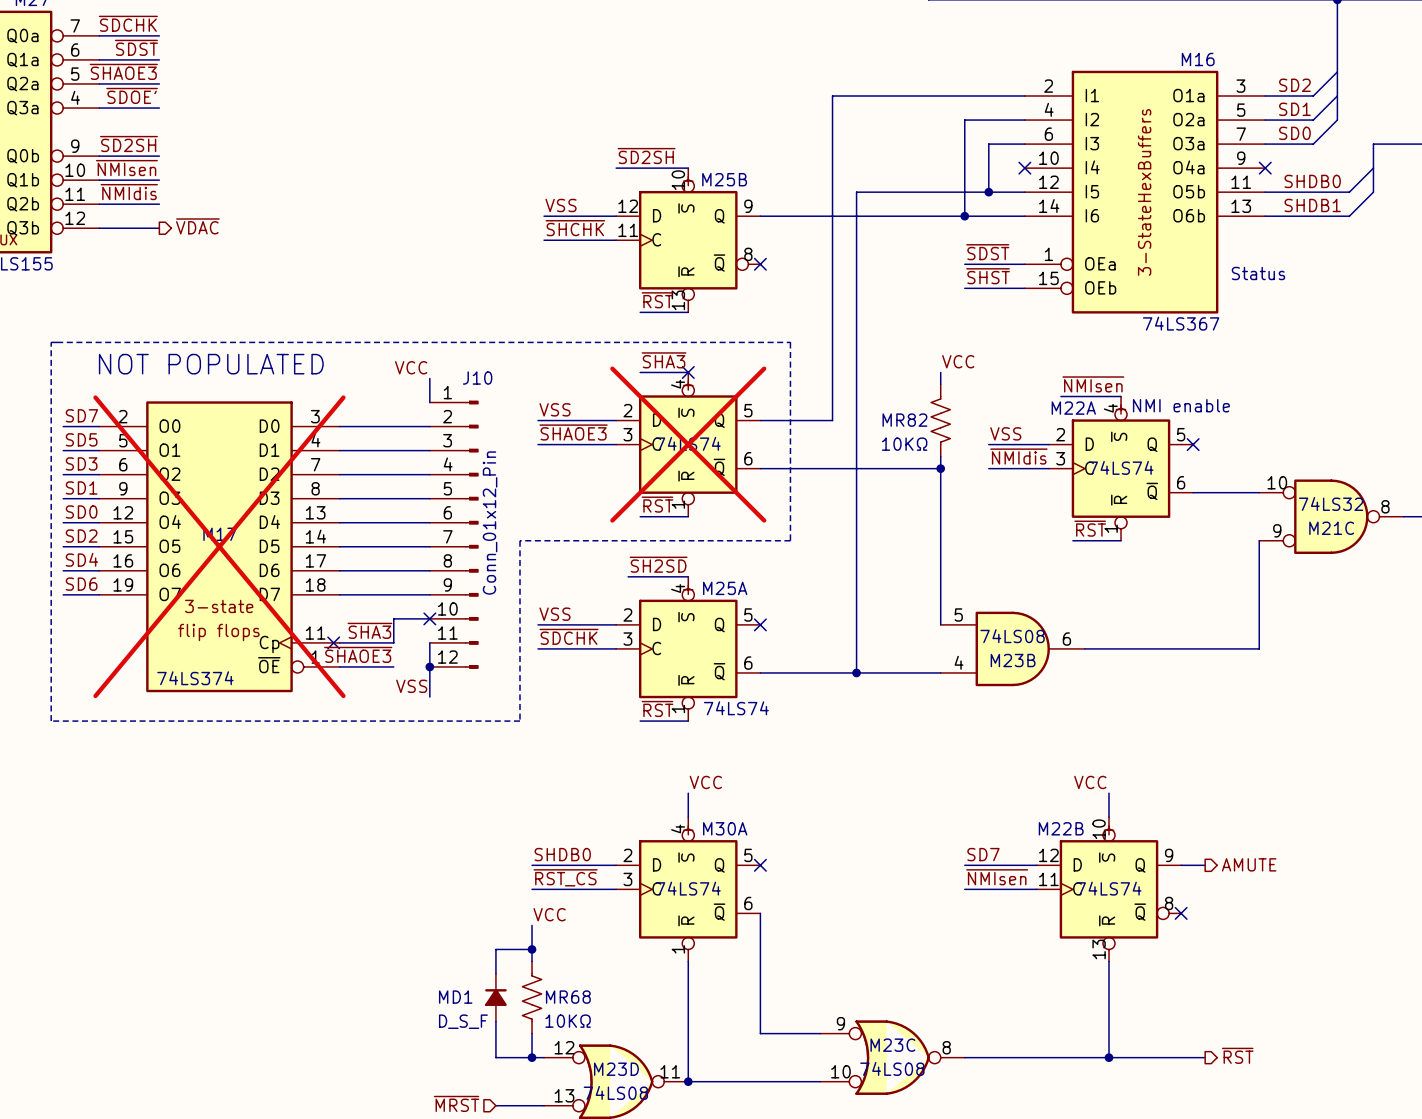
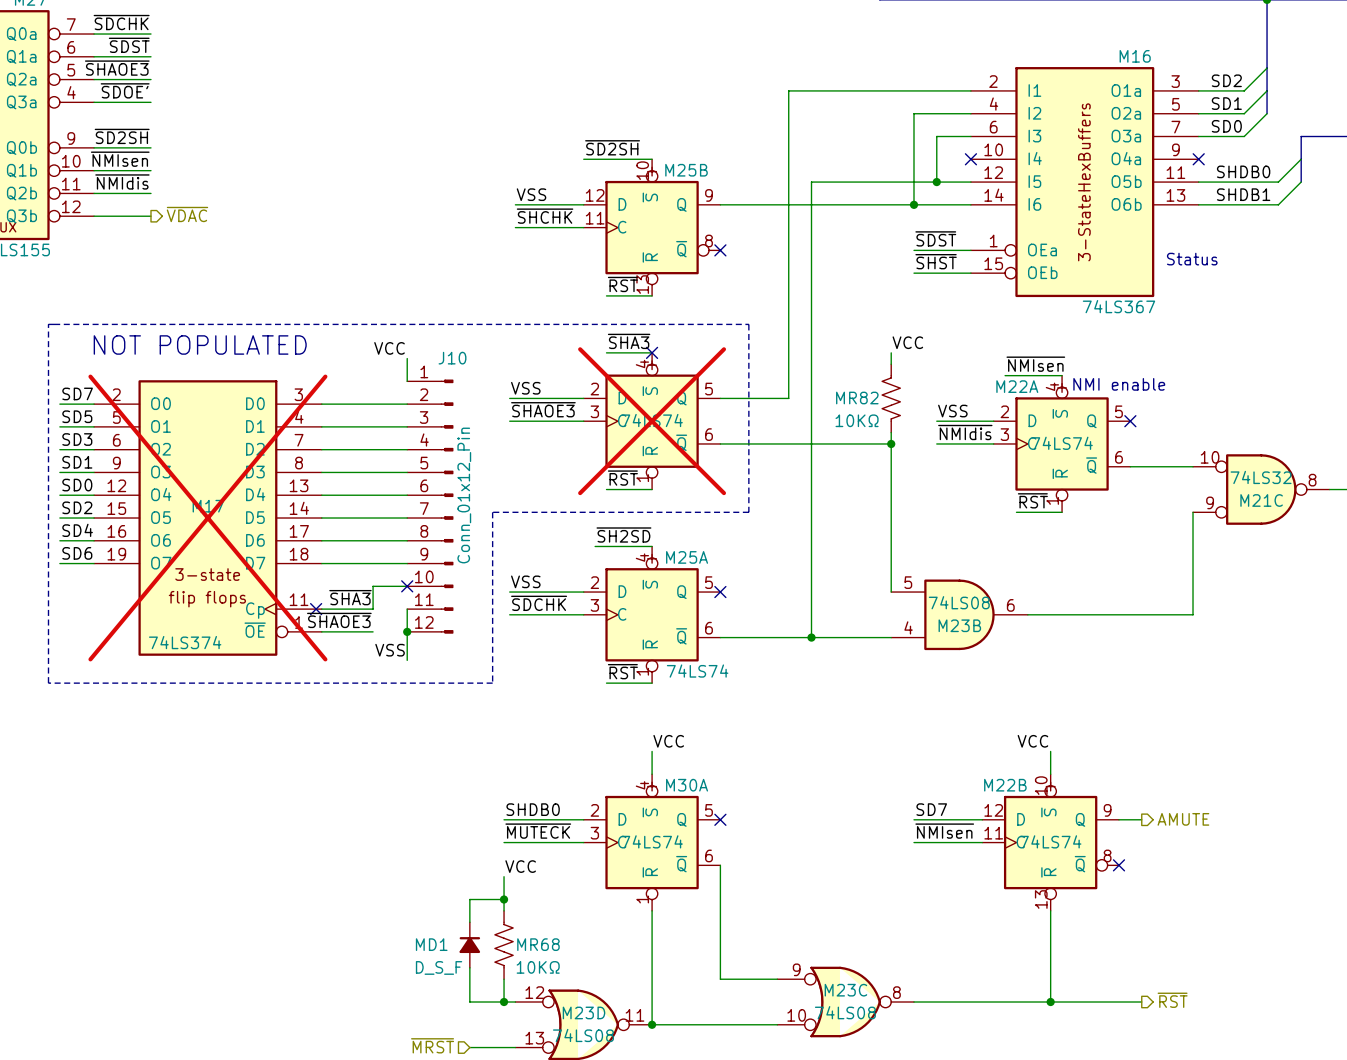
label: ~{RST_CS} (565, 877) -> ~{MUTECK} (538, 831)

